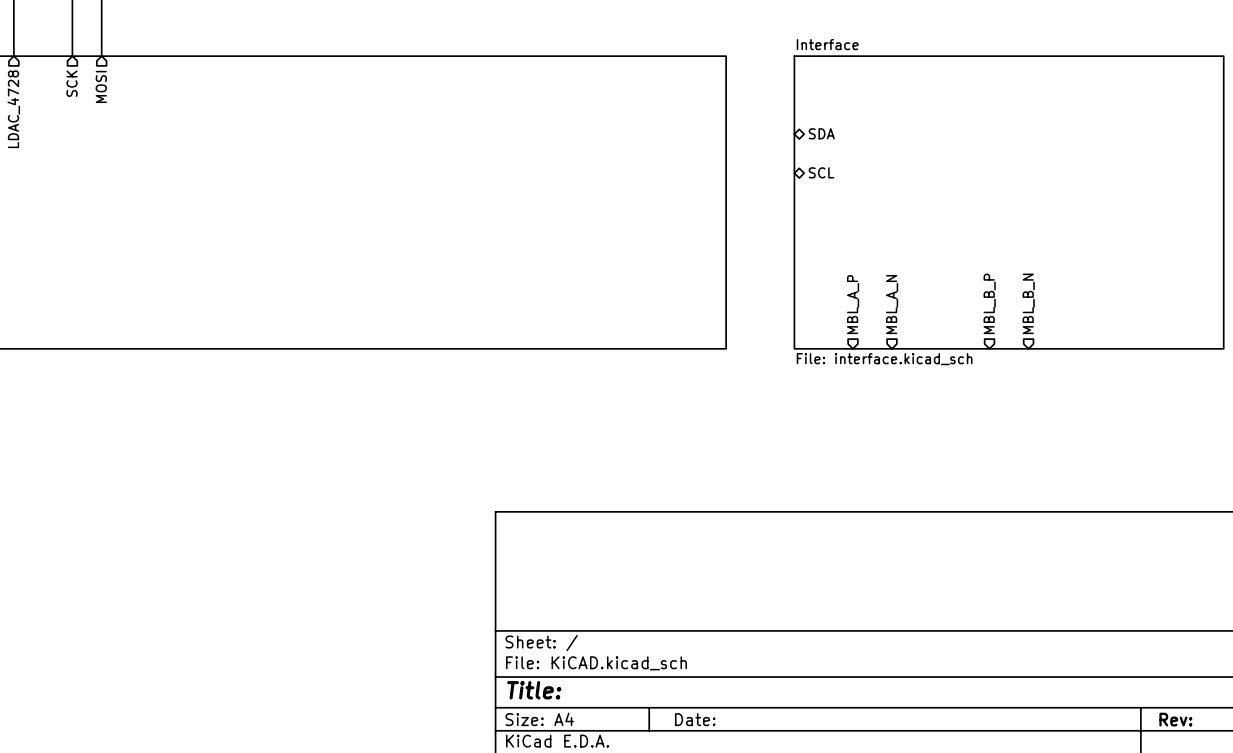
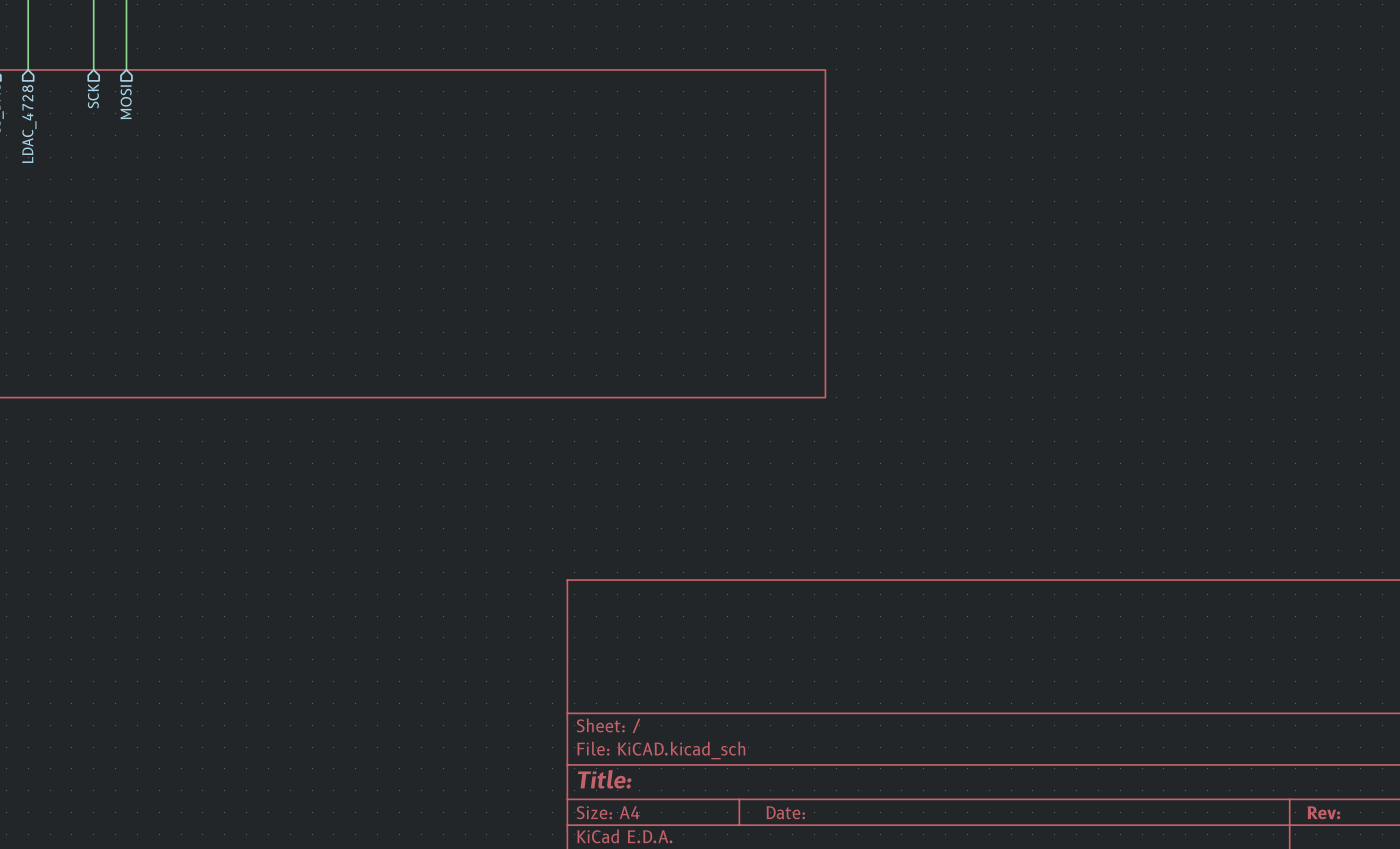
sheet pin: SDA (821, 133) -> none
sheet pin: SCL (821, 172) -> none
sheet Interface: File: interface.kicad_sch (1009, 202) -> none
sheet pin: MBL_B_P (989, 303) -> none
sheet pin: MBL_B_N (1028, 303) -> none
sheet pin: MBL_A_P (853, 304) -> none
sheet pin: MBL_A_N (892, 304) -> none

